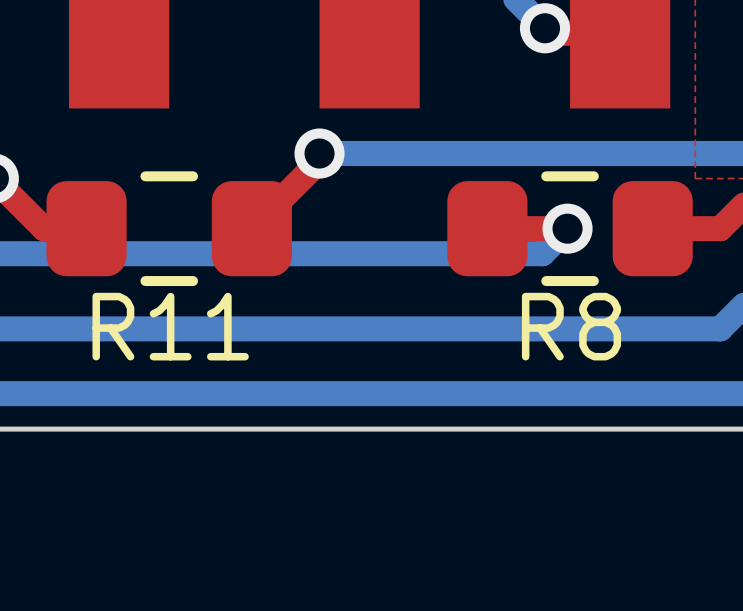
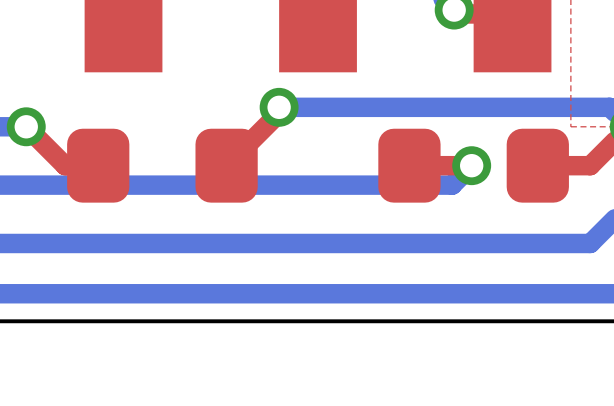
R11: (169, 228) -> none
R8: (570, 228) -> none

